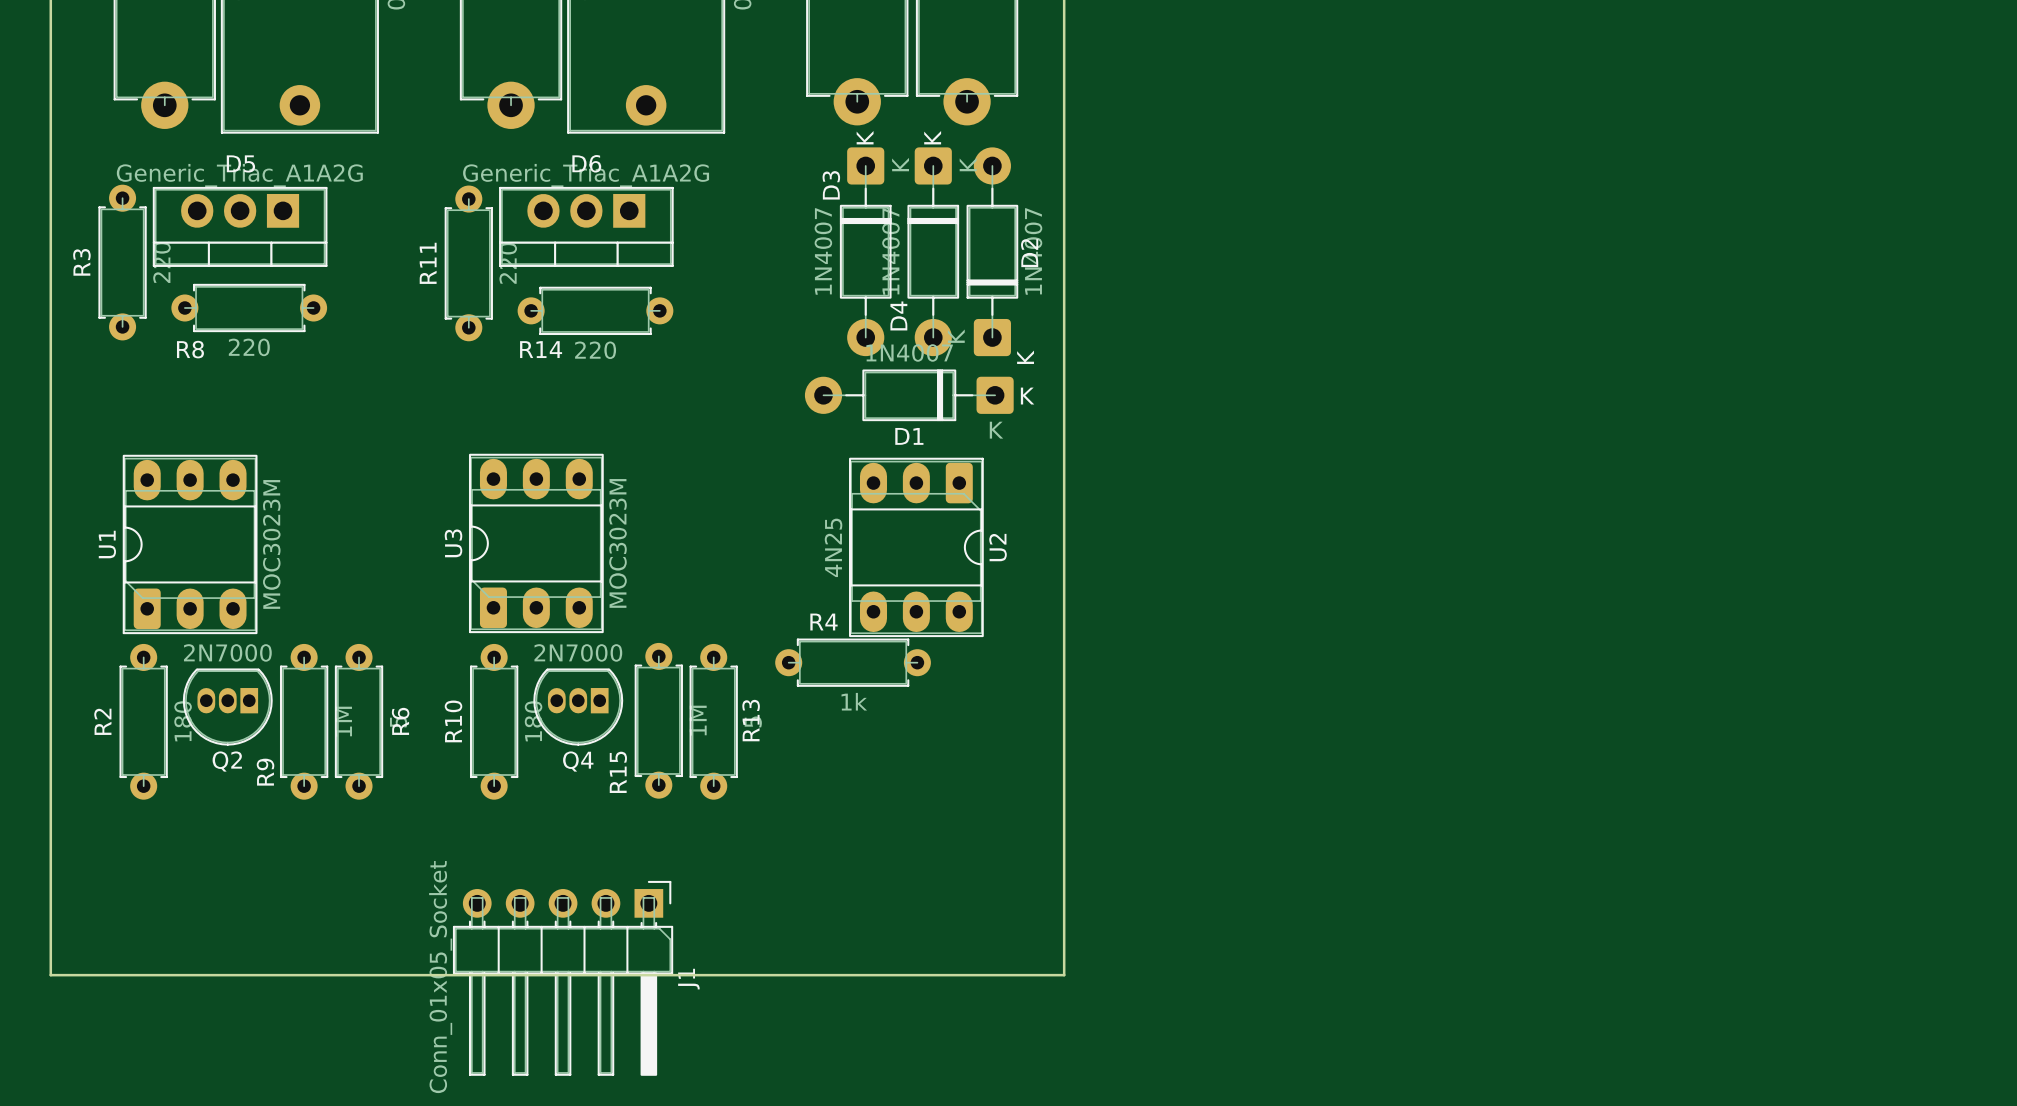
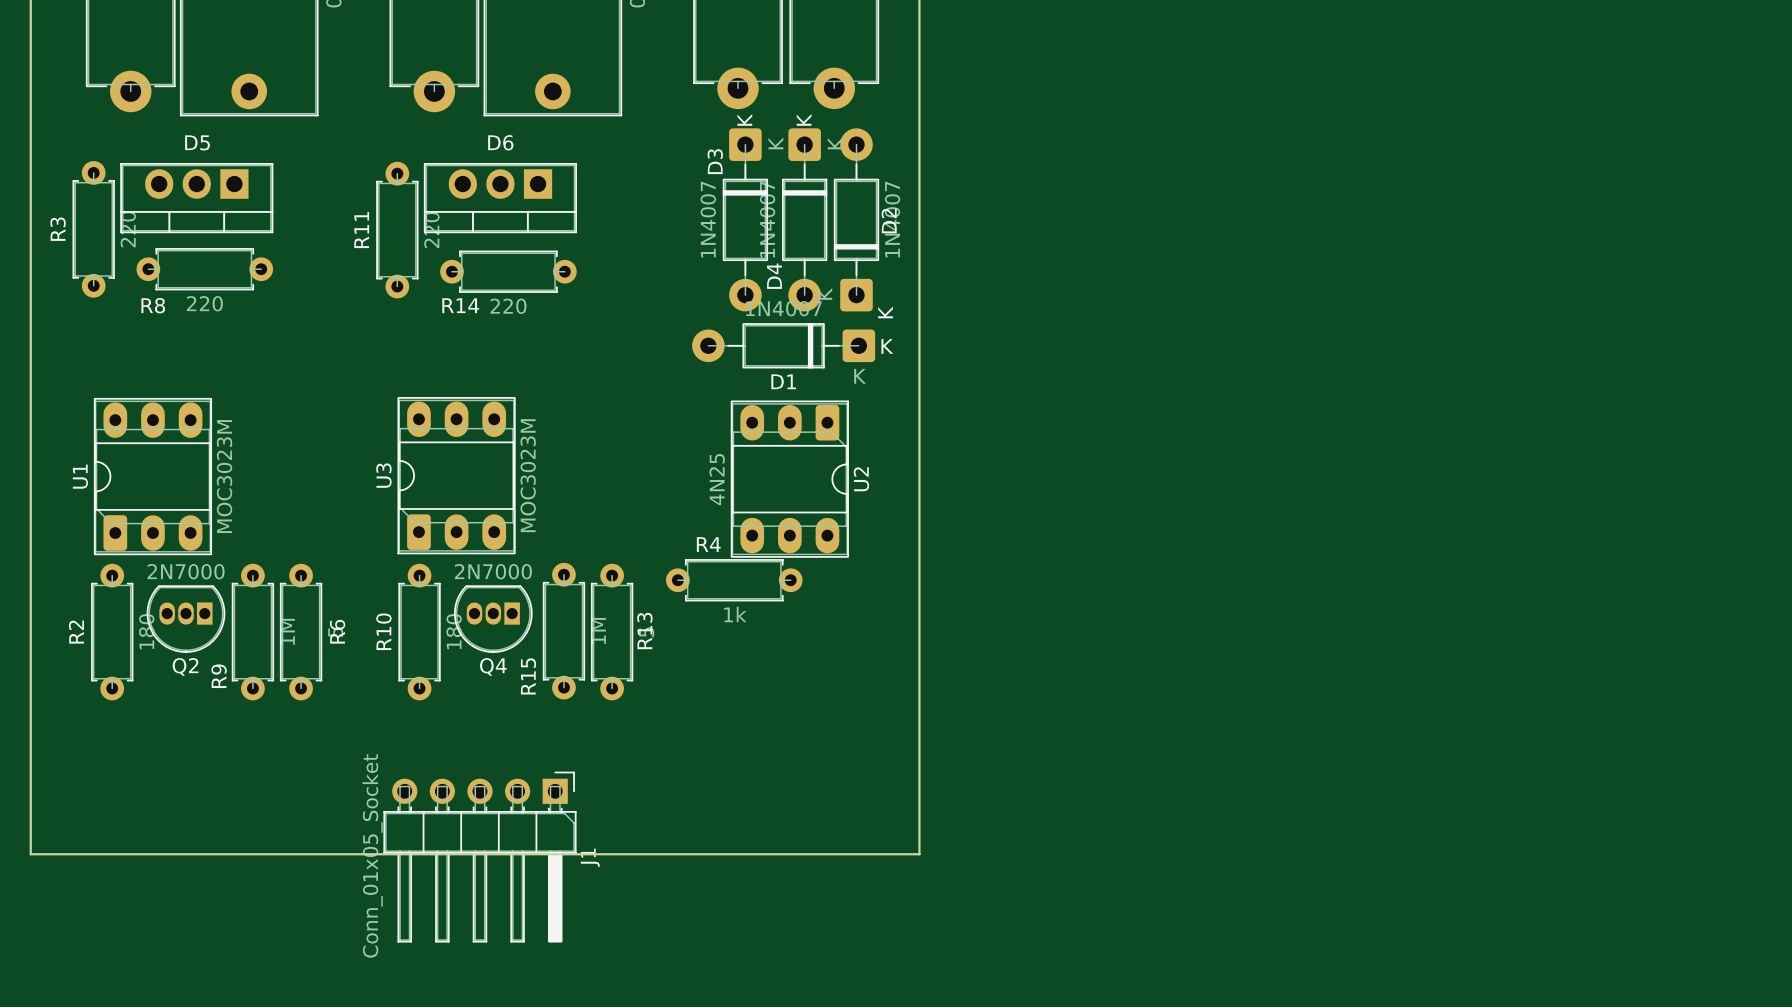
D5 value: Generic_Triac_A1A2G (239, 175) -> none
D6 value: Generic_Triac_A1A2G (586, 175) -> none

